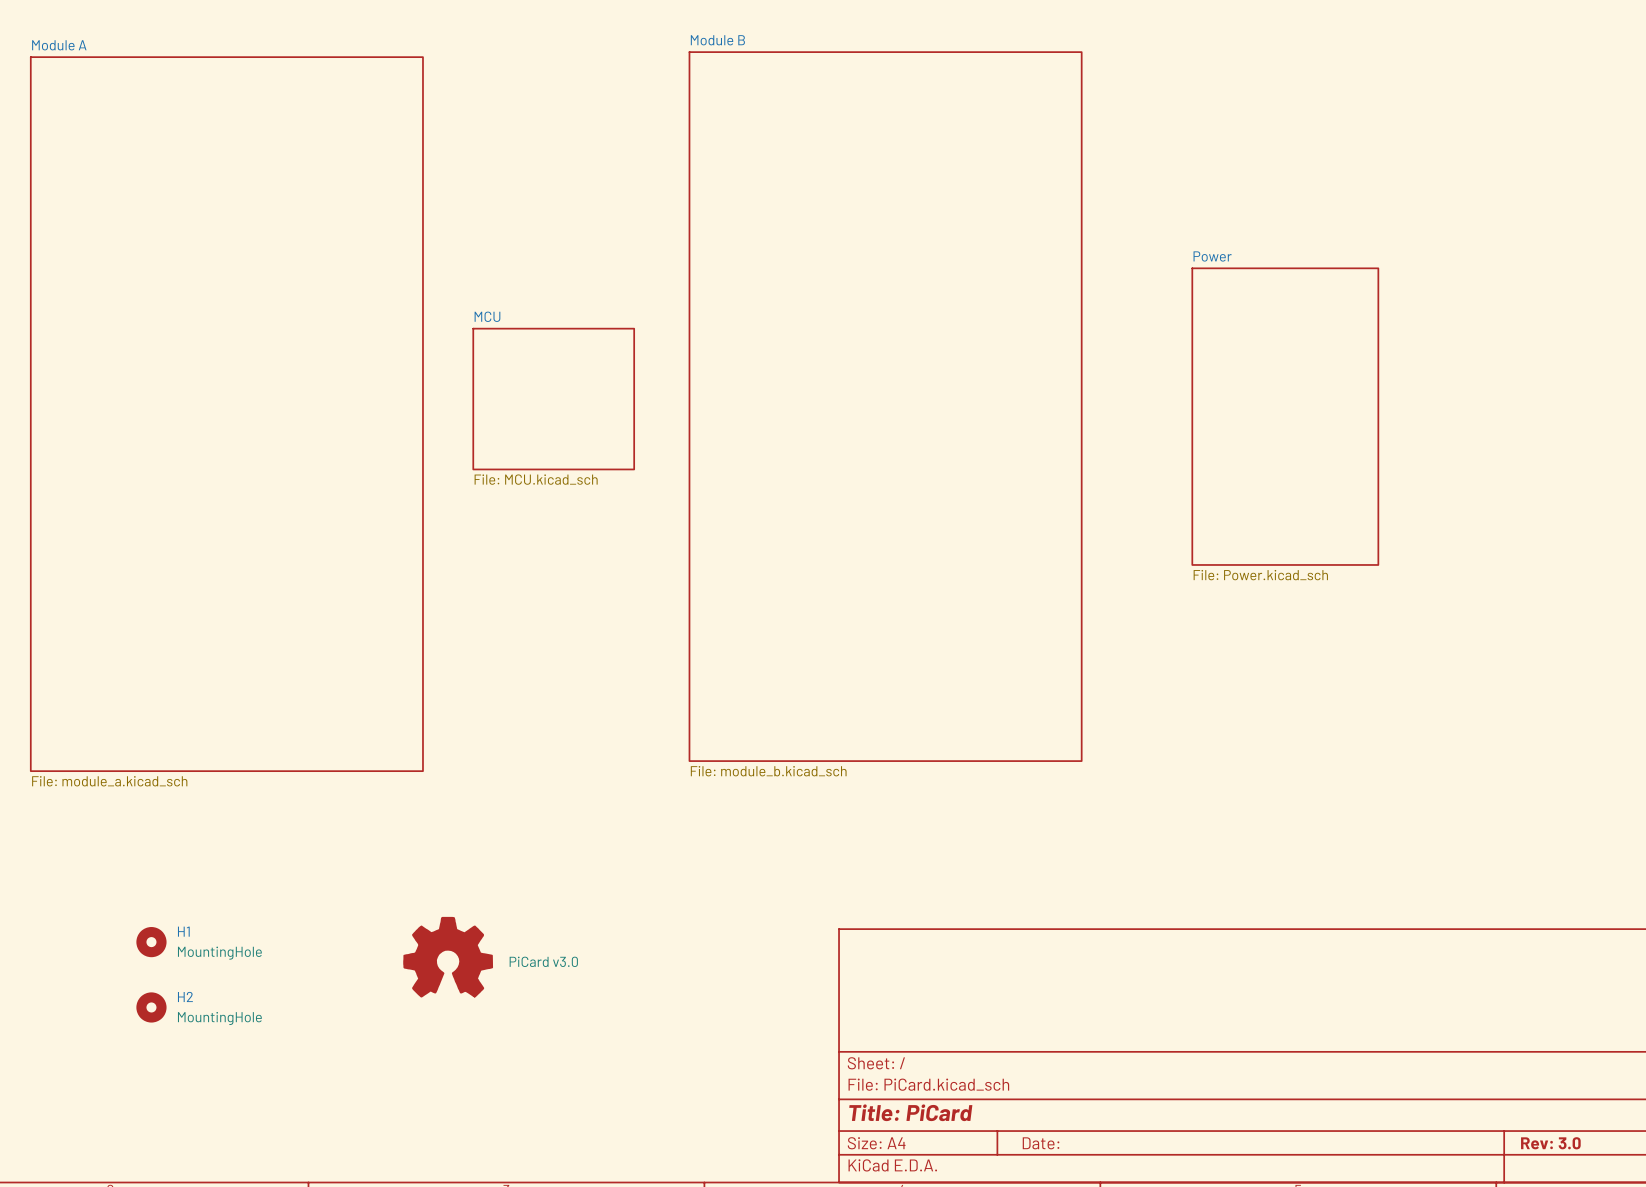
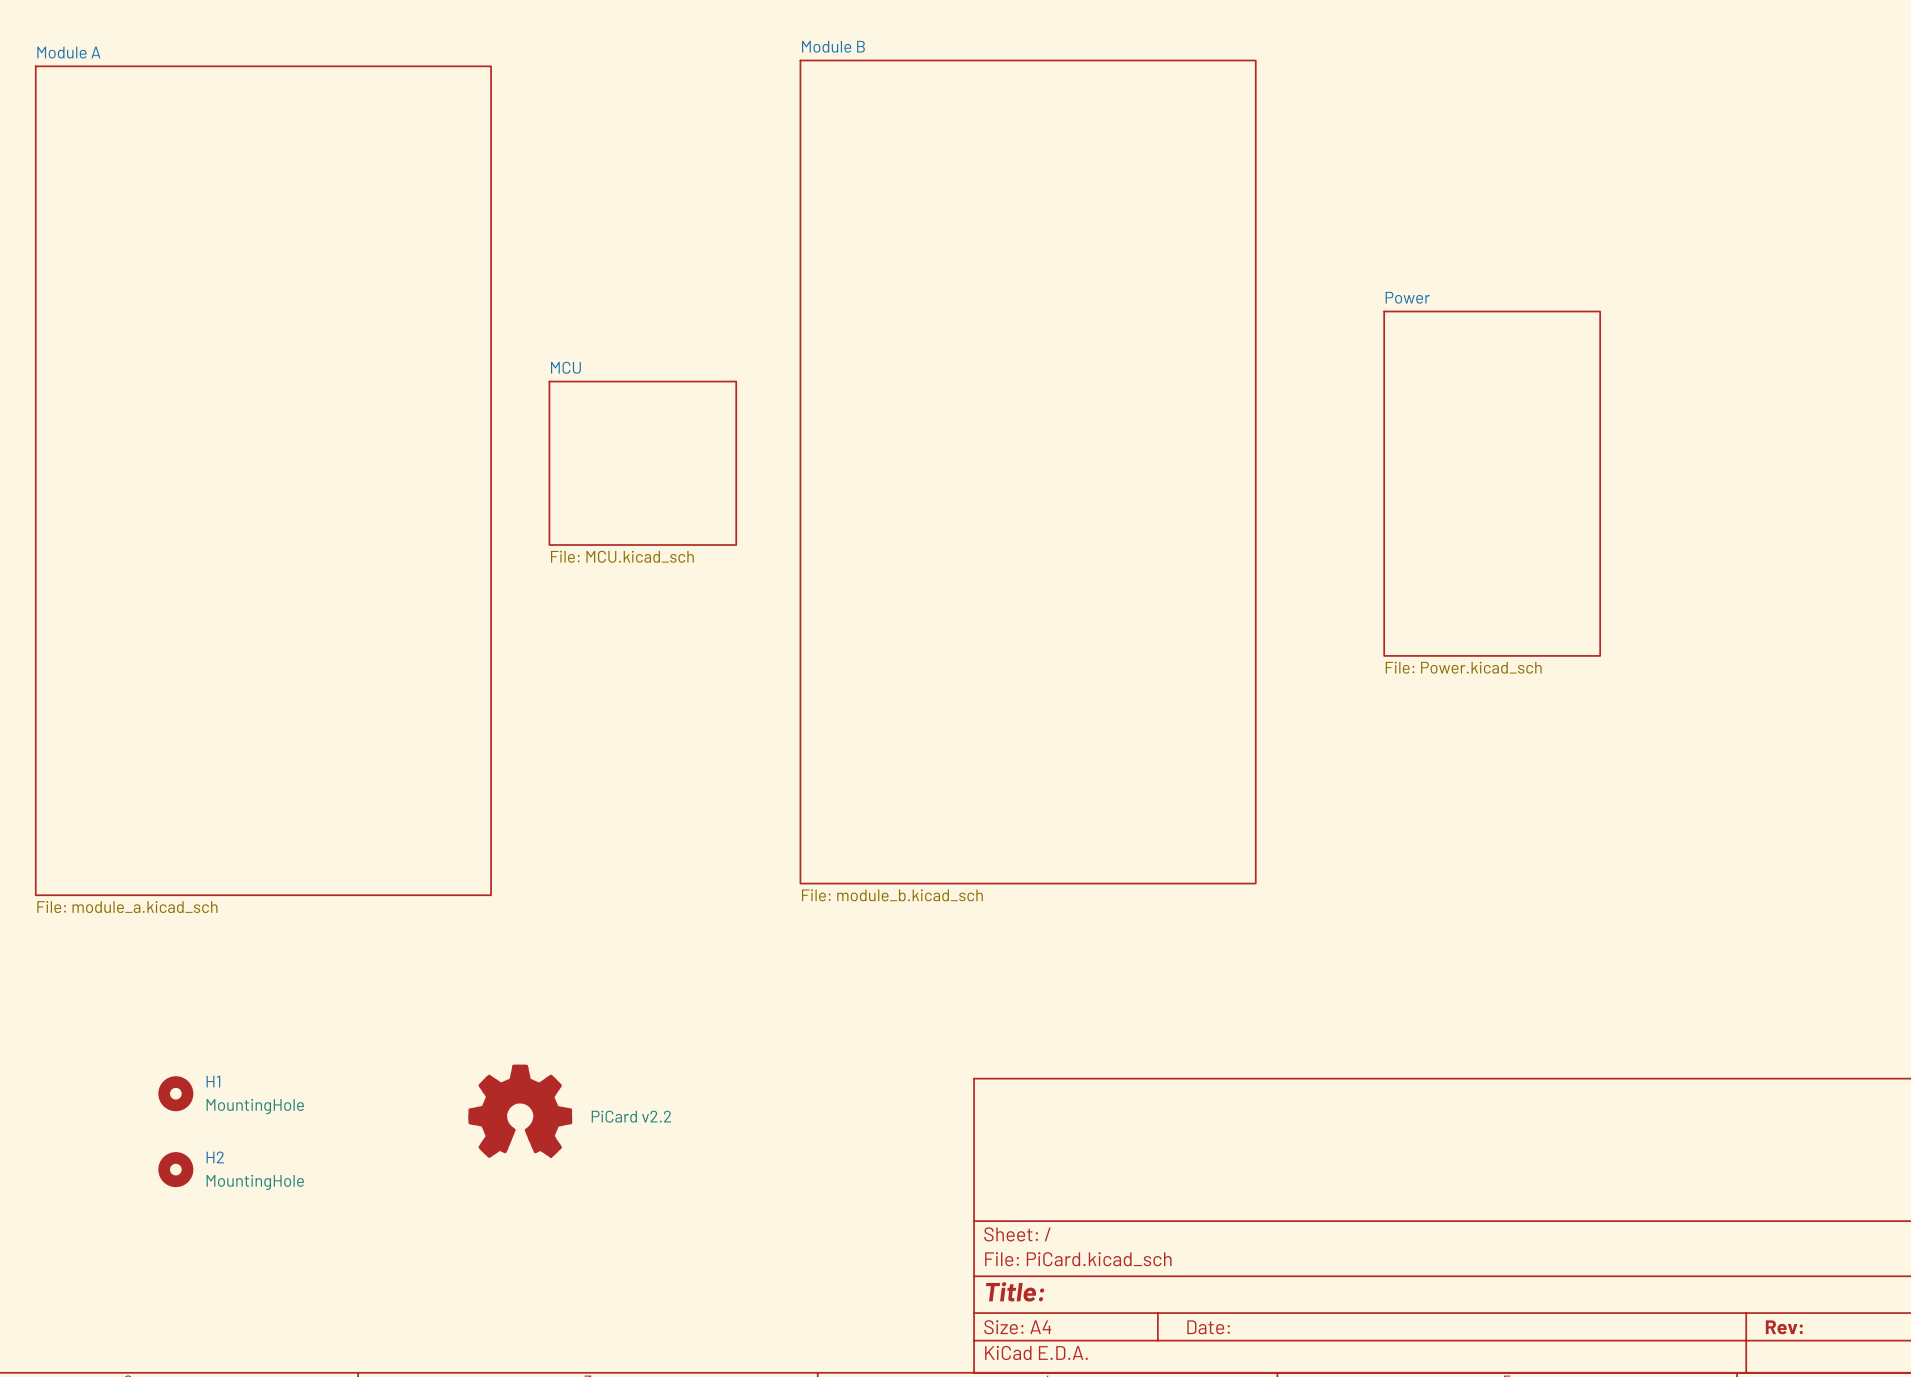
part value: PiCard v3.0 (543, 961) -> PiCard v2.2 (631, 1116)
title block: Title: PiCard (910, 1112) -> Title: (1015, 1291)
title block: Rev: 3.0 (1550, 1143) -> Rev: (1784, 1327)

